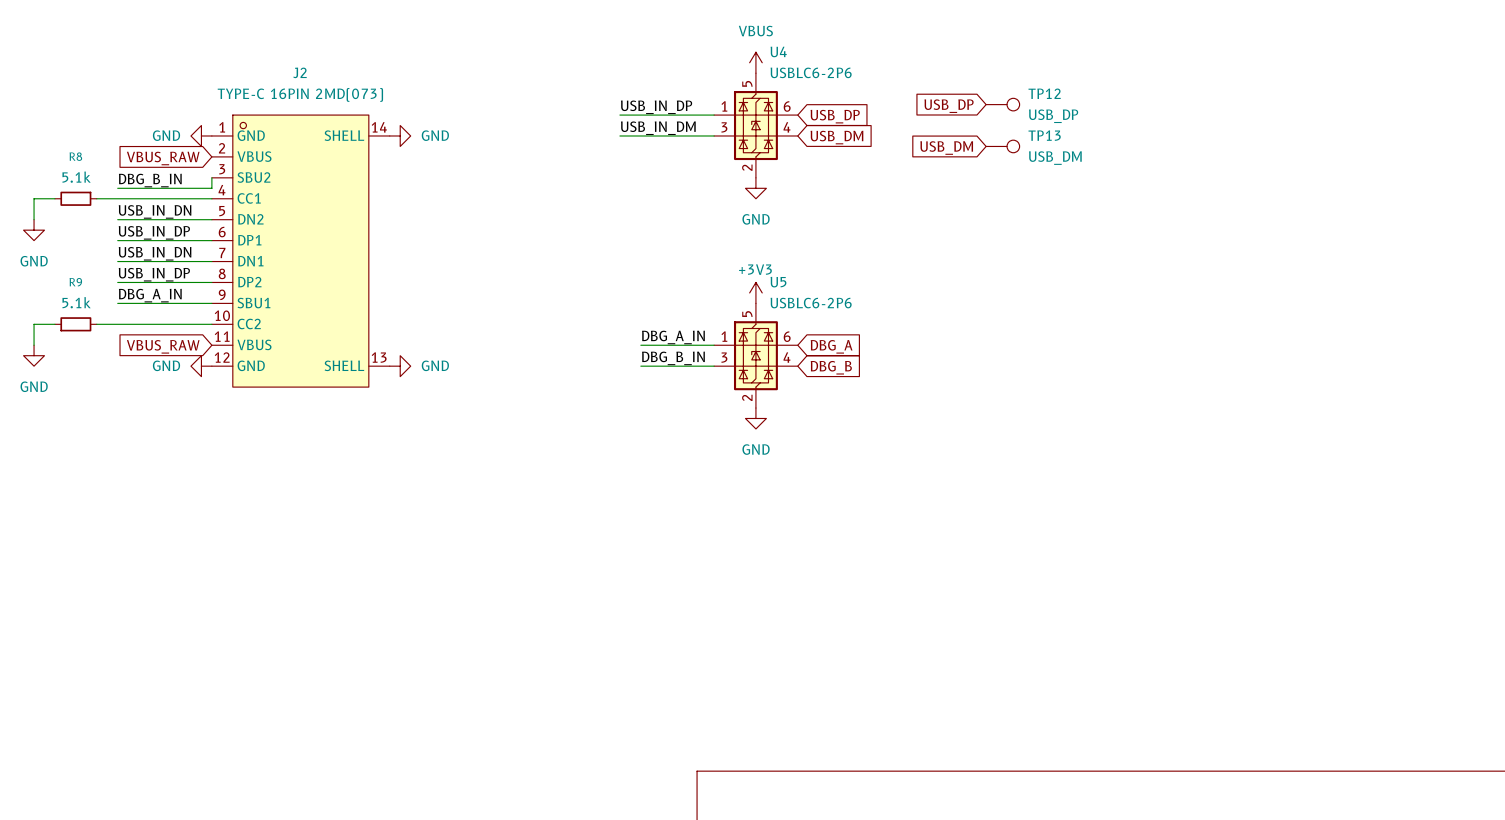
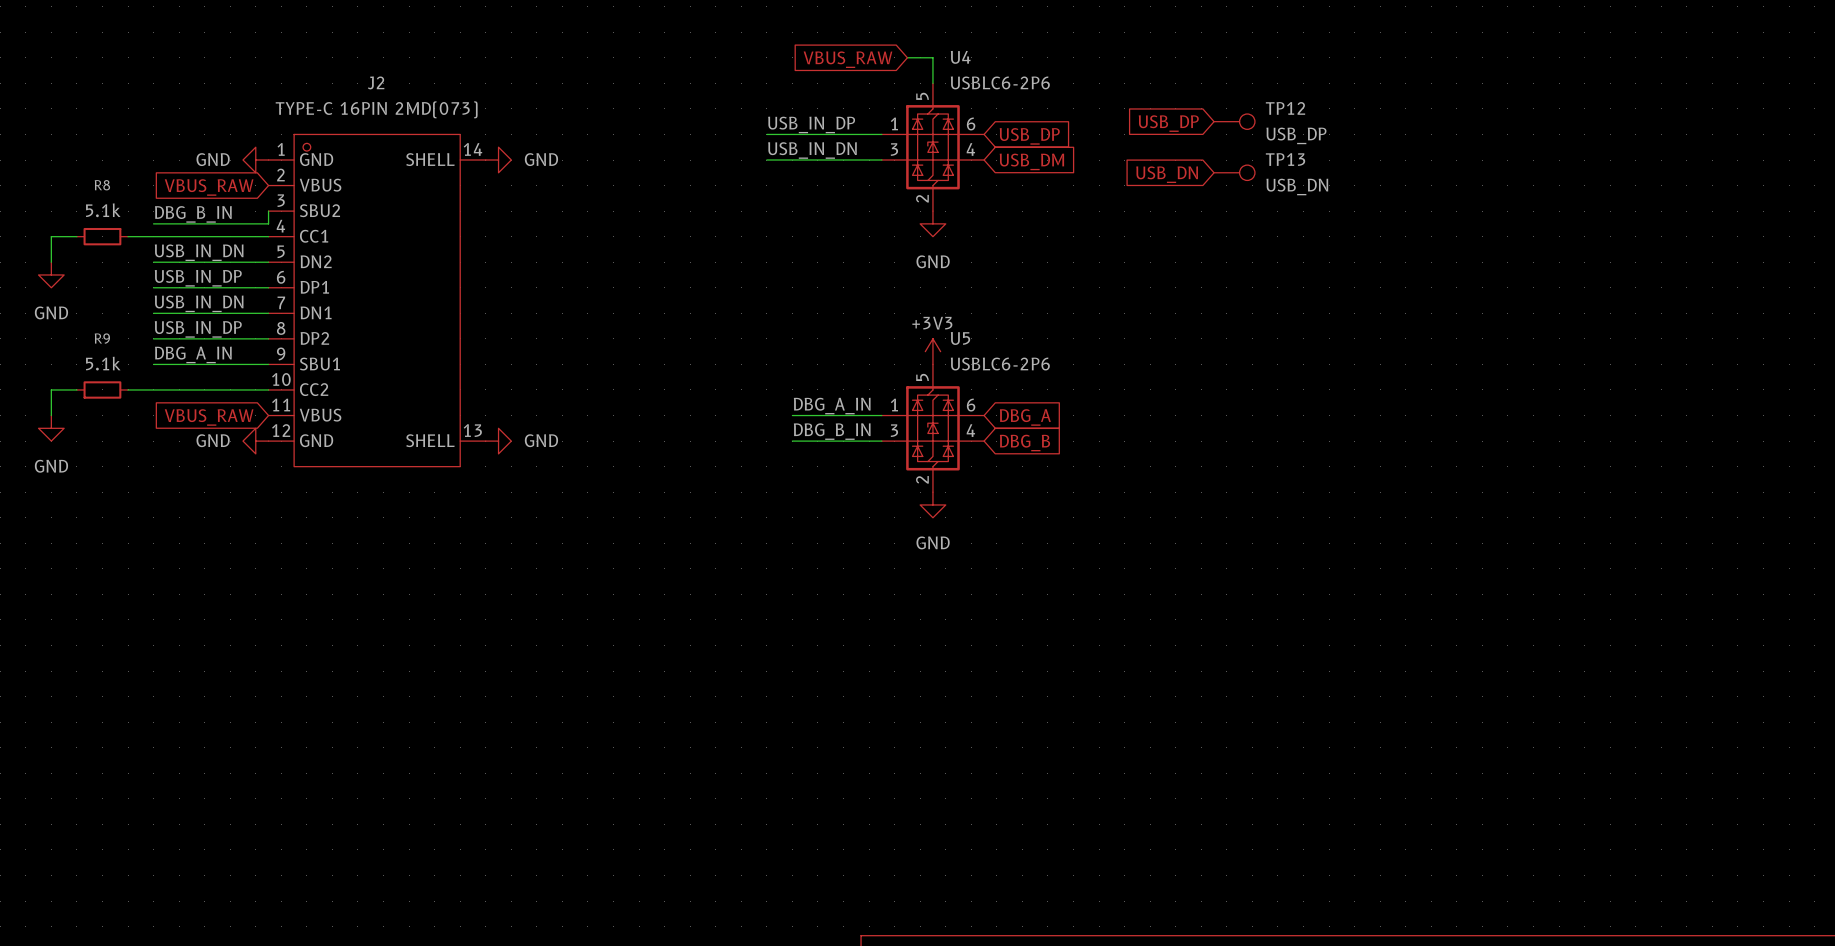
wire: none -> (907, 57) (932, 57) (932, 83)
global label: none -> VBUS_RAW (847, 59)
power symbol: VBUS (755, 62) -> none
label: USB_IN_DM (658, 128) -> USB_IN_DN (812, 150)
global label: USB_DM (946, 148) -> USB_DN (1167, 174)
TP13 value: USB_DM (1055, 158) -> USB_DN (1297, 186)

